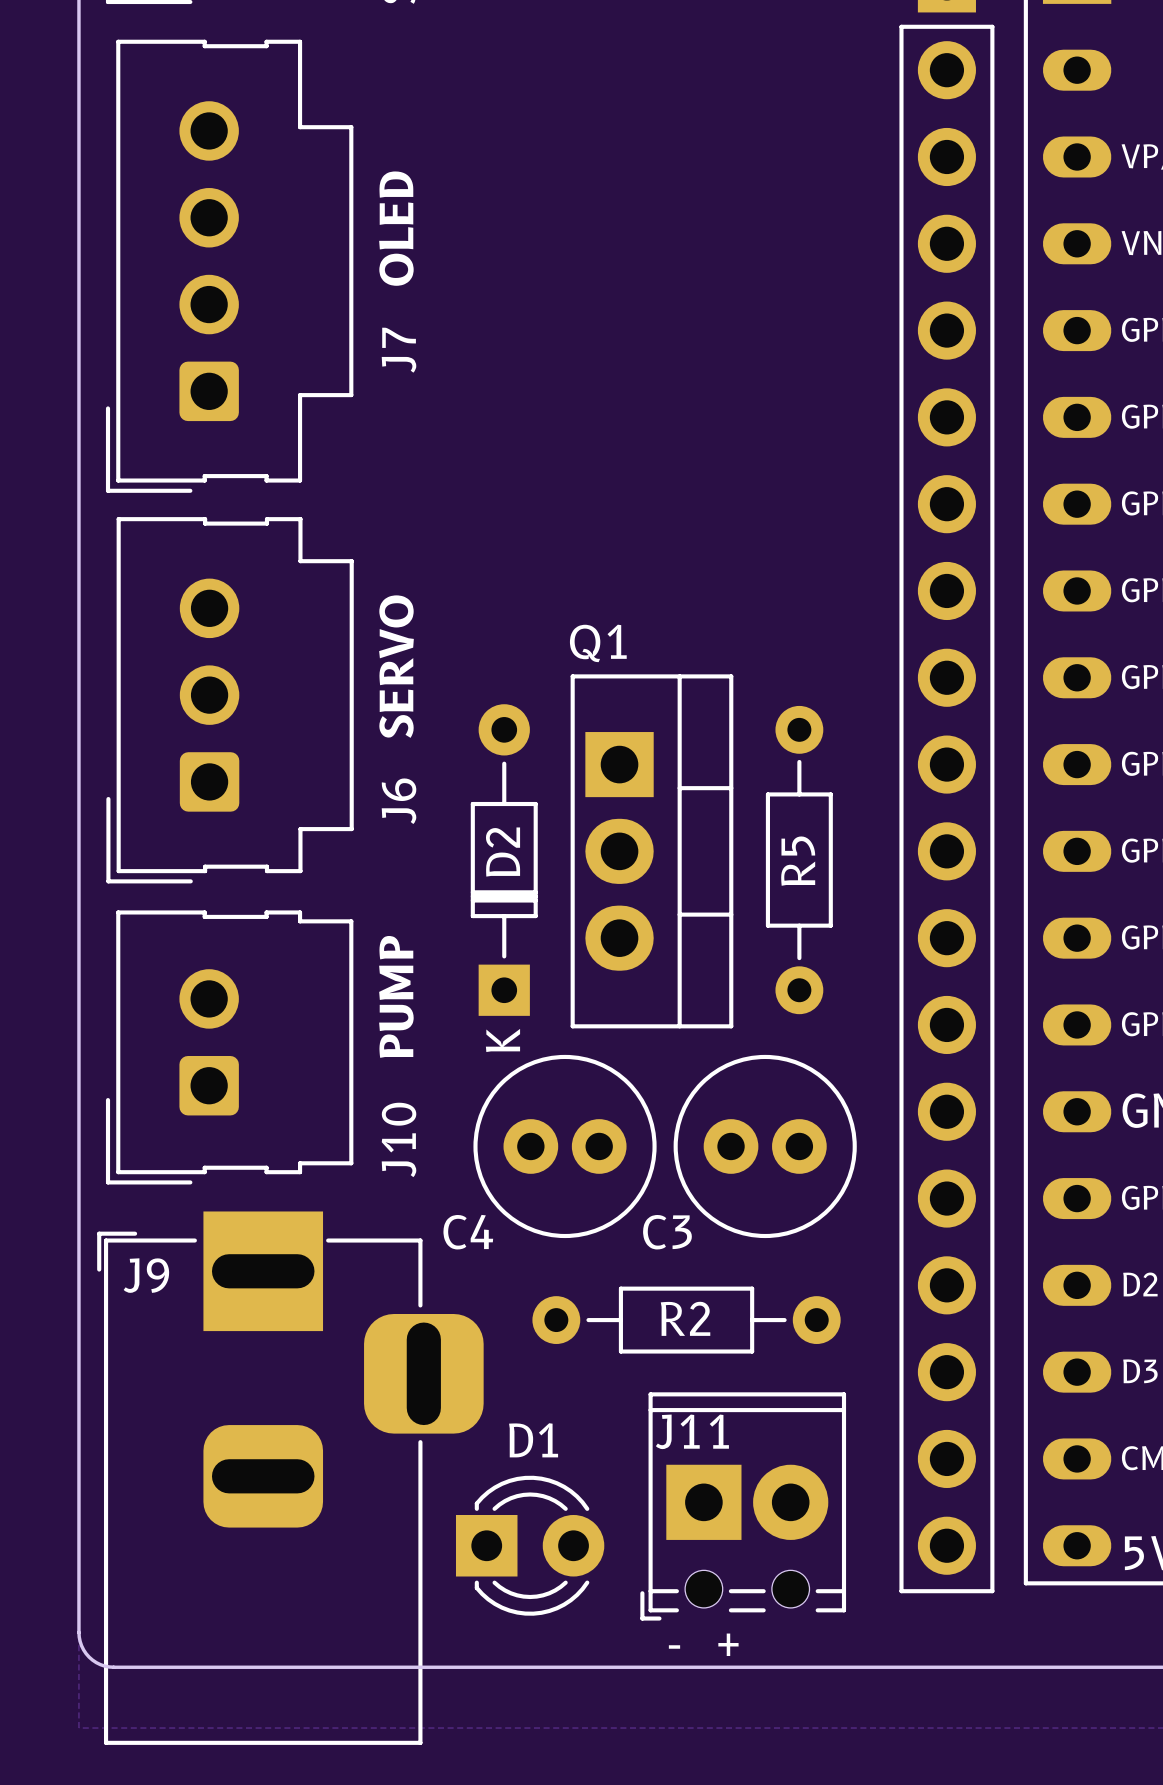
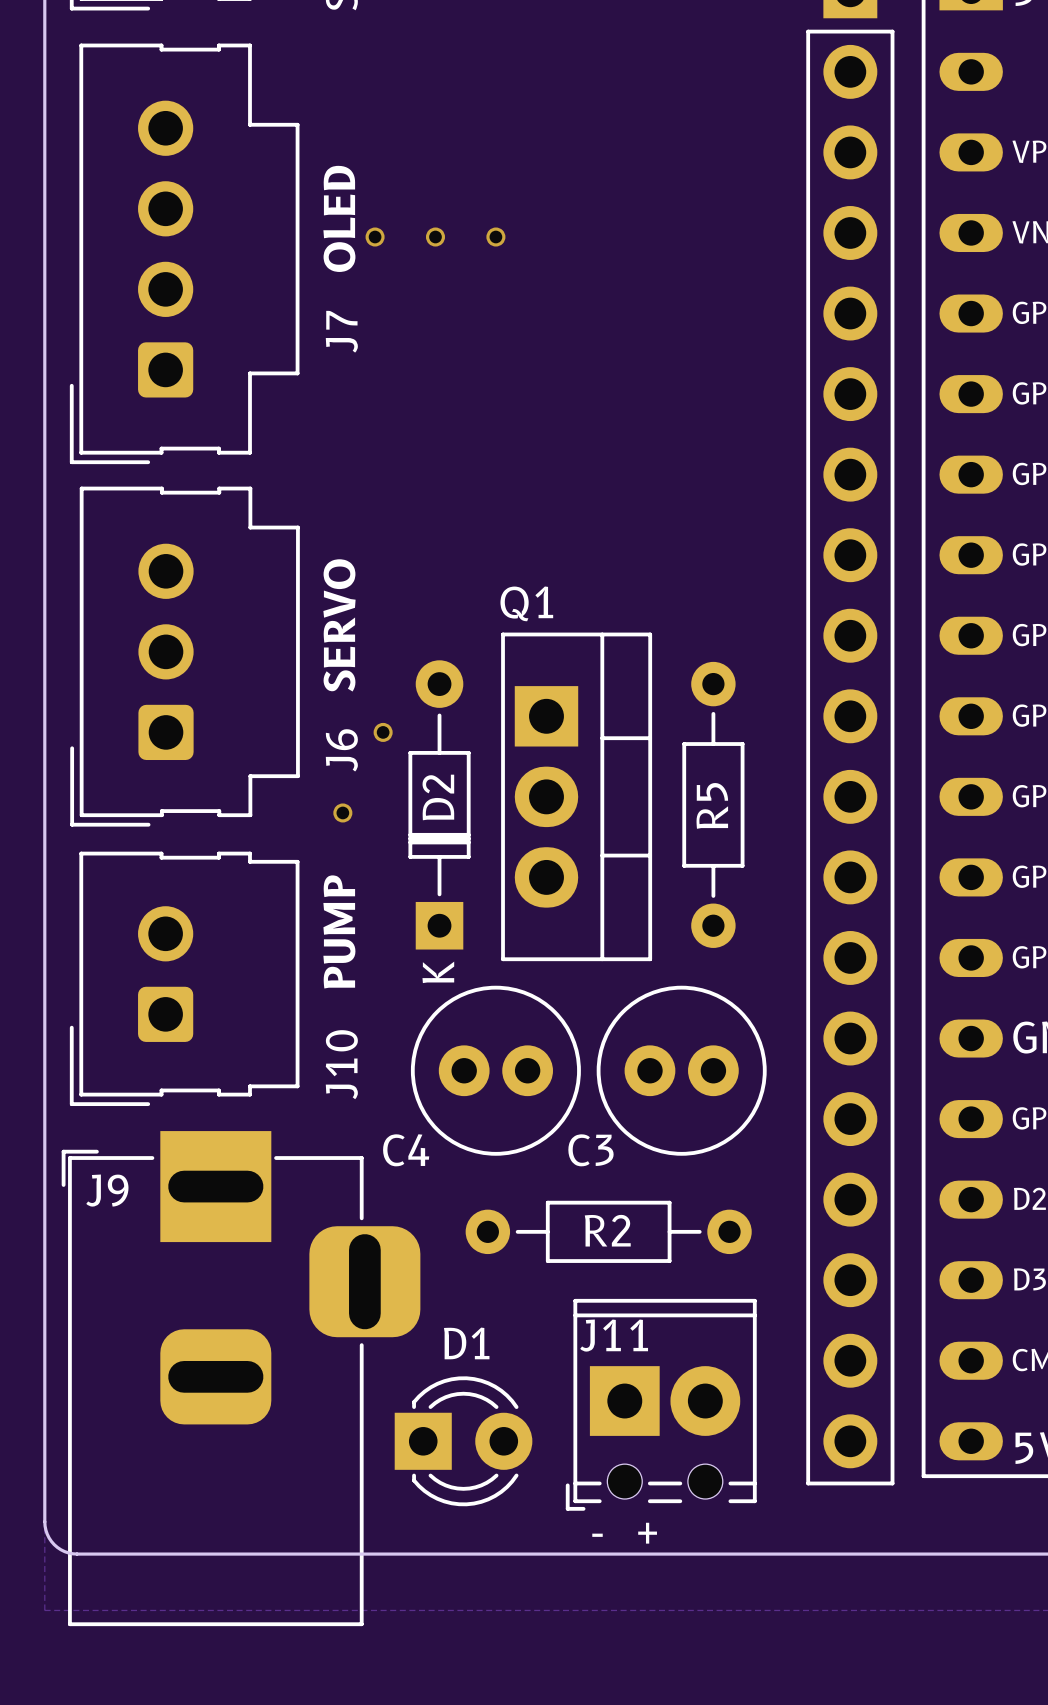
via: none -> (375, 237)
via: none -> (435, 237)
via: none -> (495, 237)
via: none -> (383, 732)
via: none -> (342, 812)

